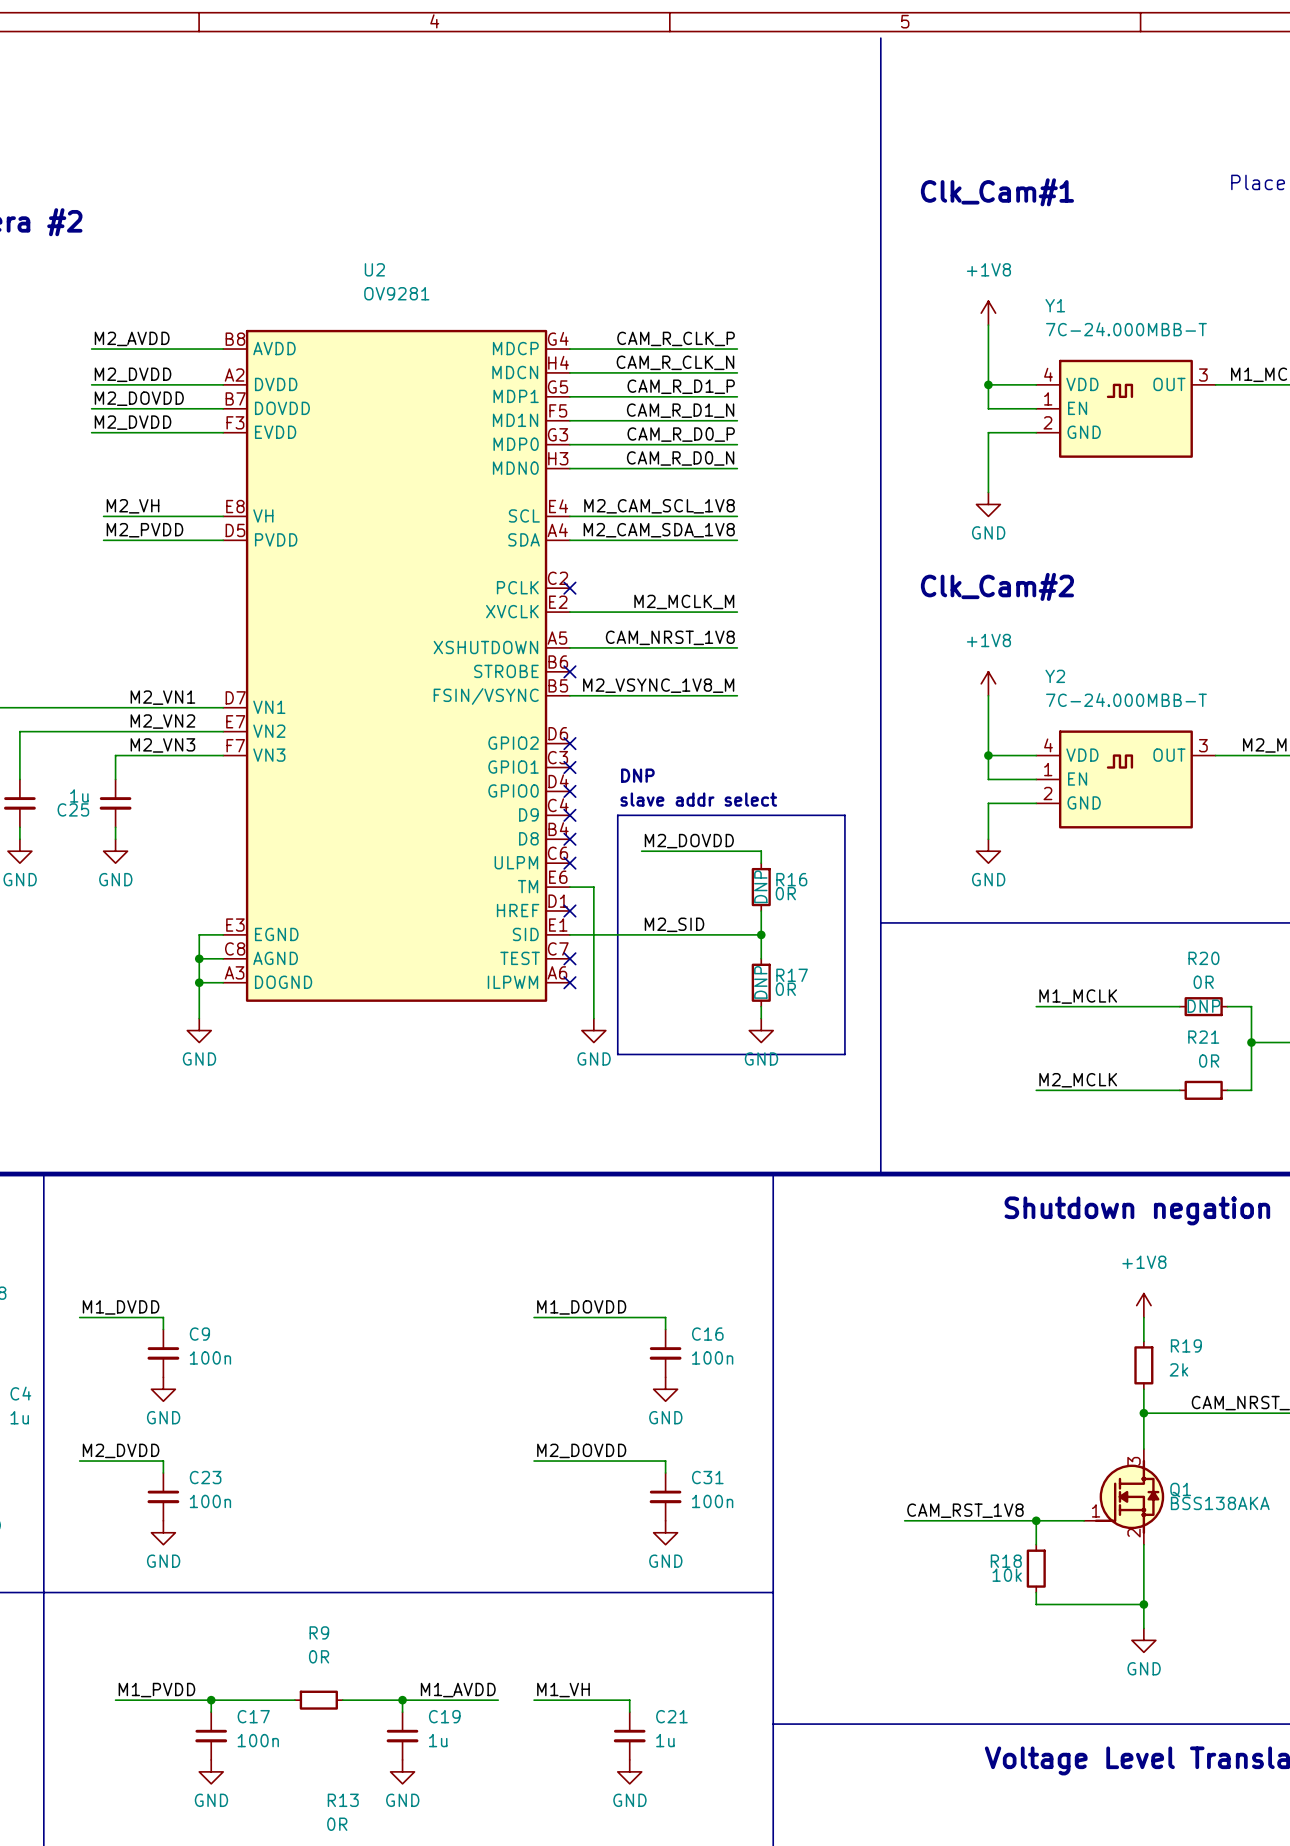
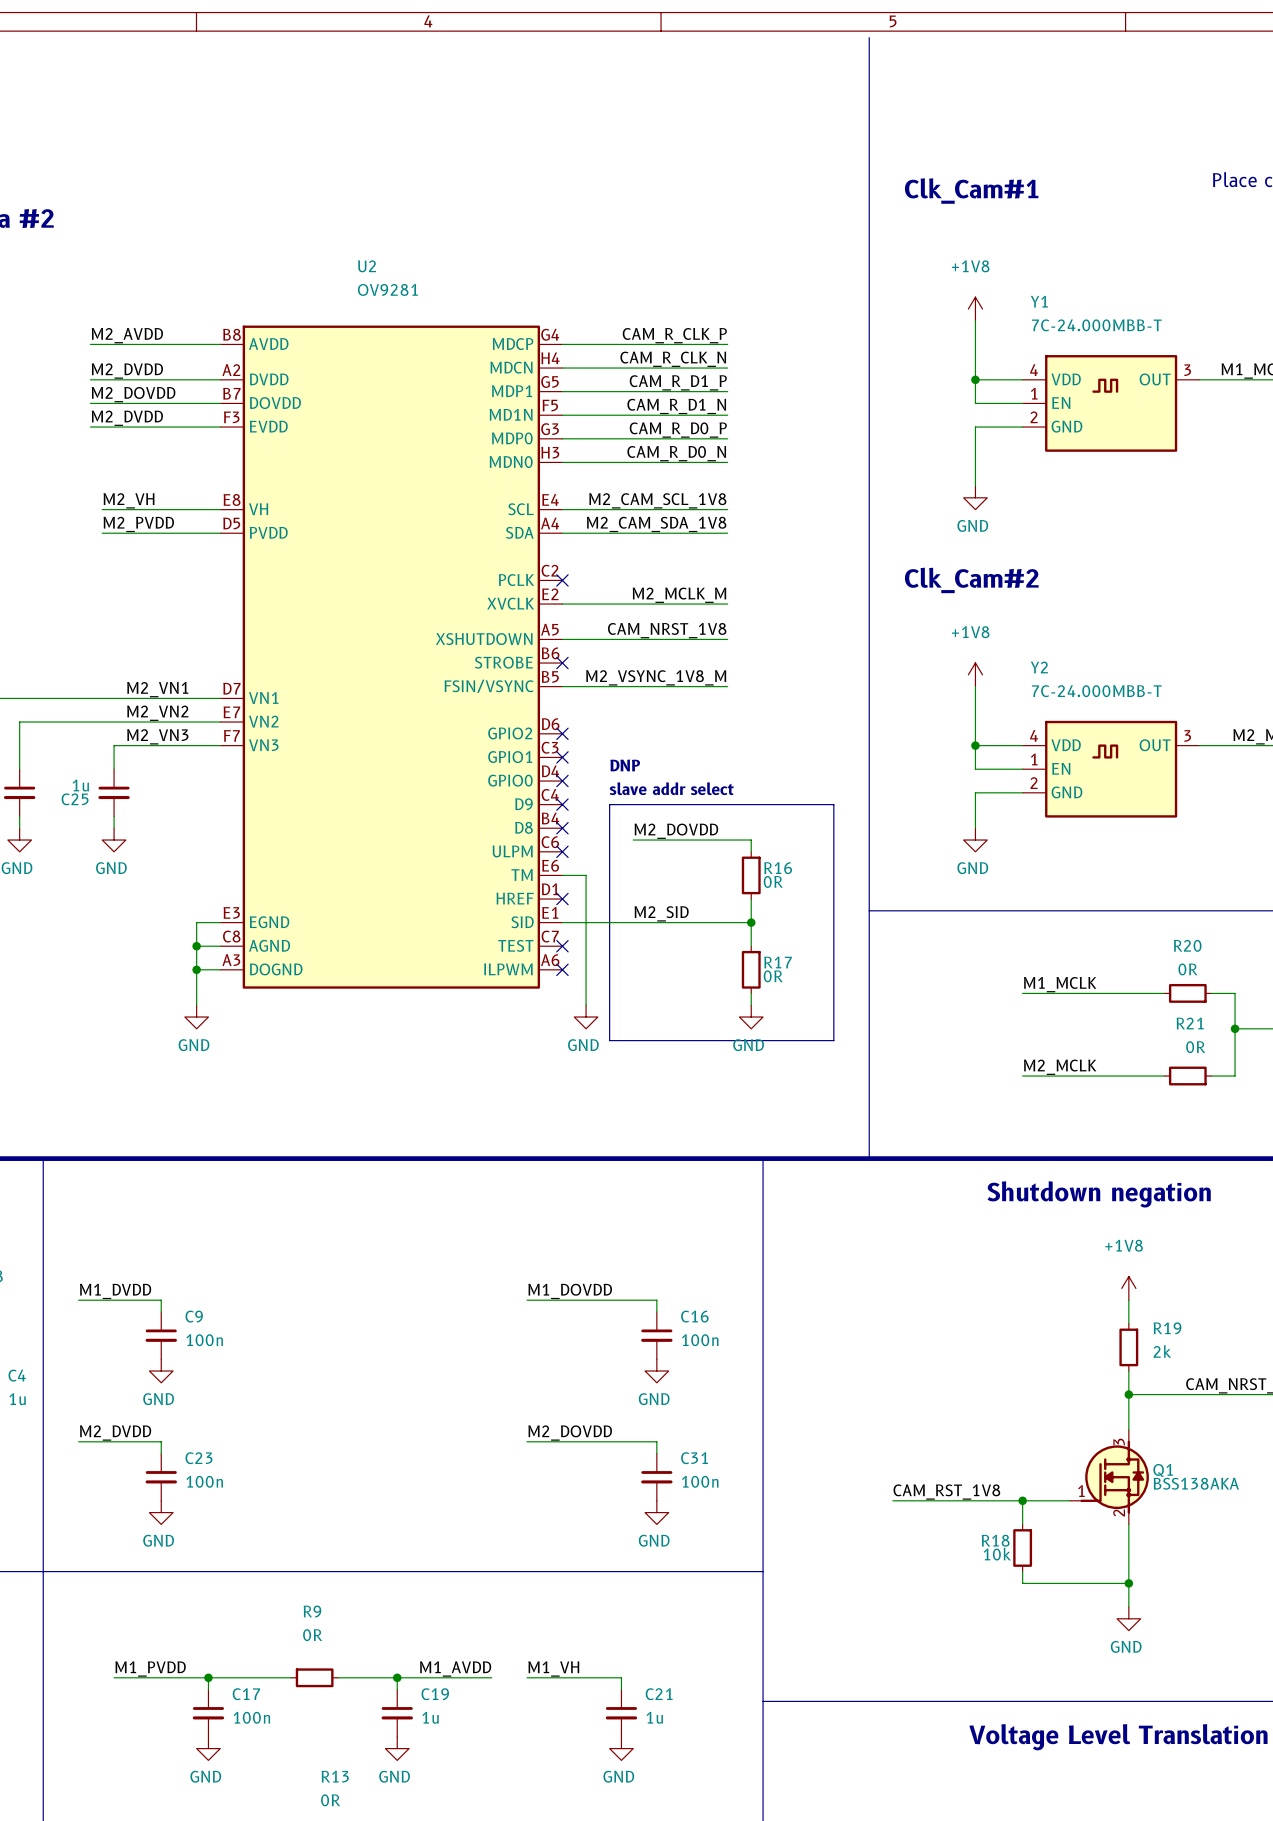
R16 text: DNP (760, 886) -> none
R17 text: DNP (760, 982) -> none
R20 text: DNP (1203, 1006) -> none

